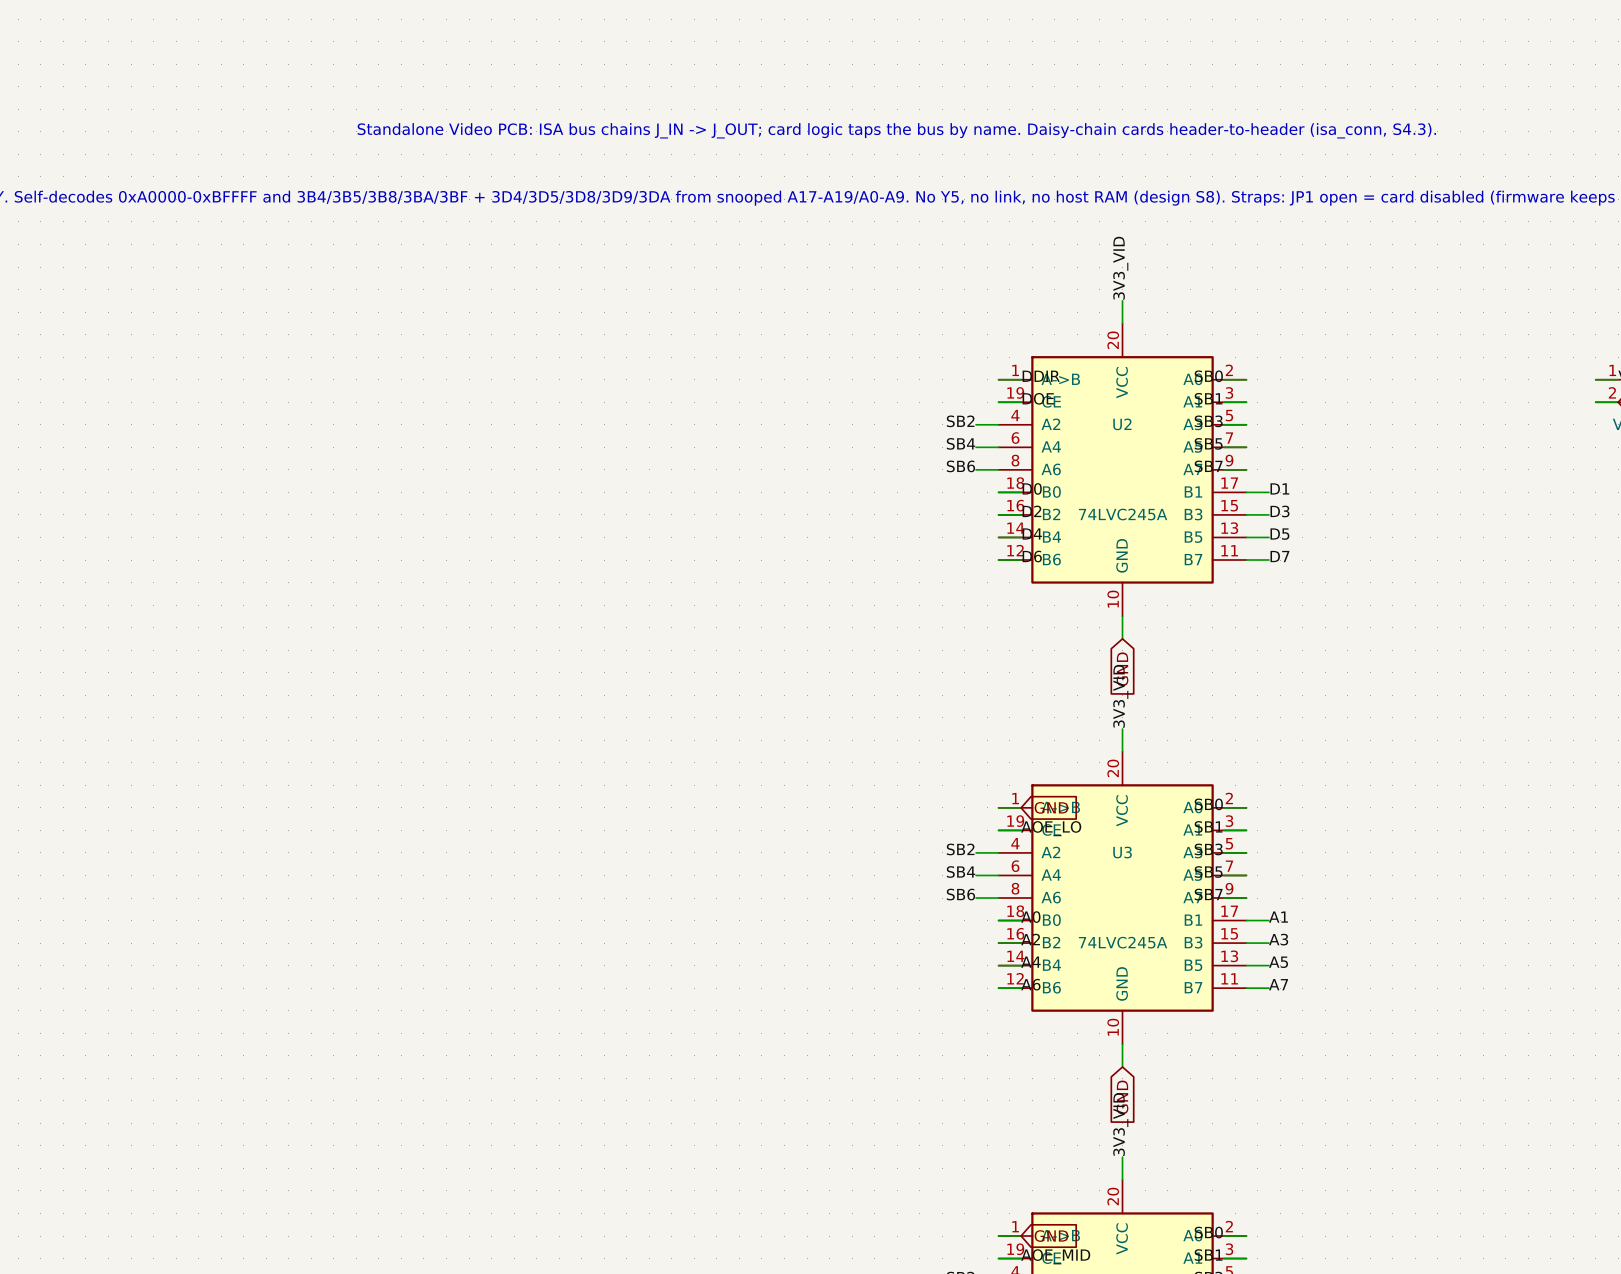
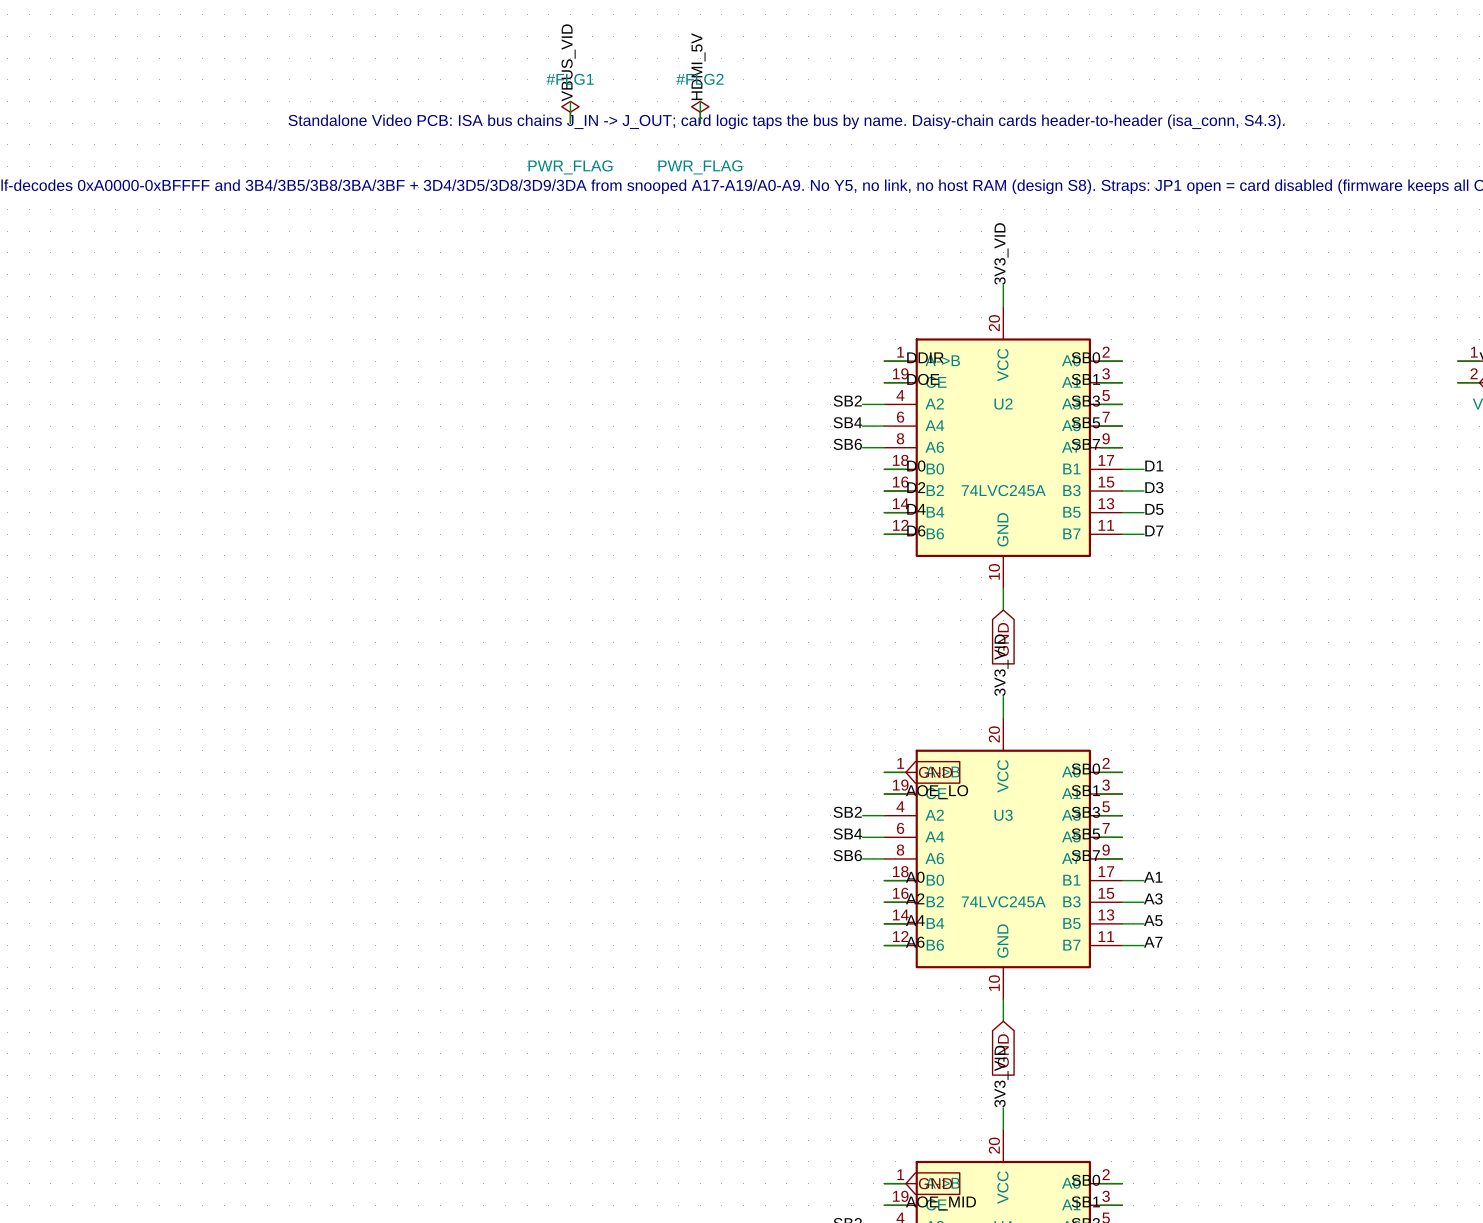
label: none -> VBUS_VID (568, 62)
label: none -> HDMI_5V (698, 66)
wire: none -> (570, 101) (570, 123)
wire: none -> (700, 101) (700, 123)
#FLG1: none -> PWR_FLAG (570, 112)
#FLG2: none -> PWR_FLAG (700, 112)

